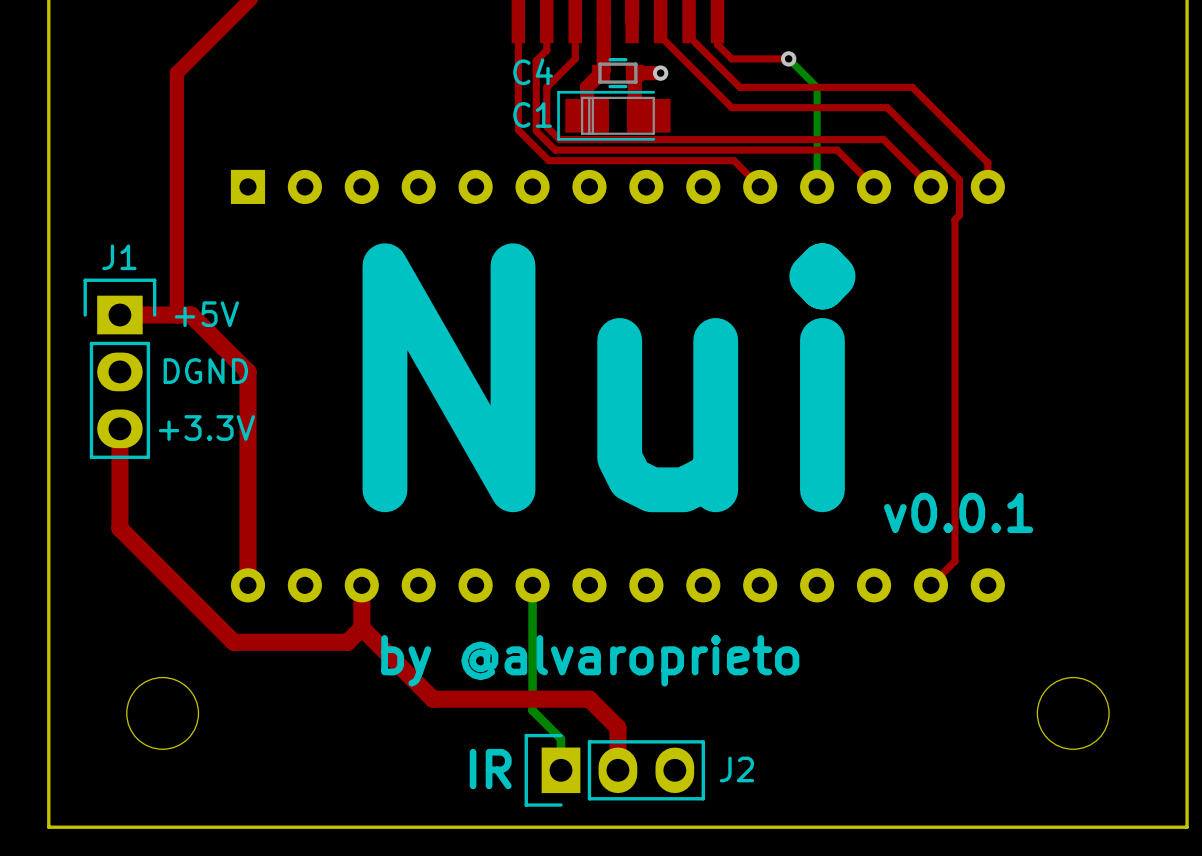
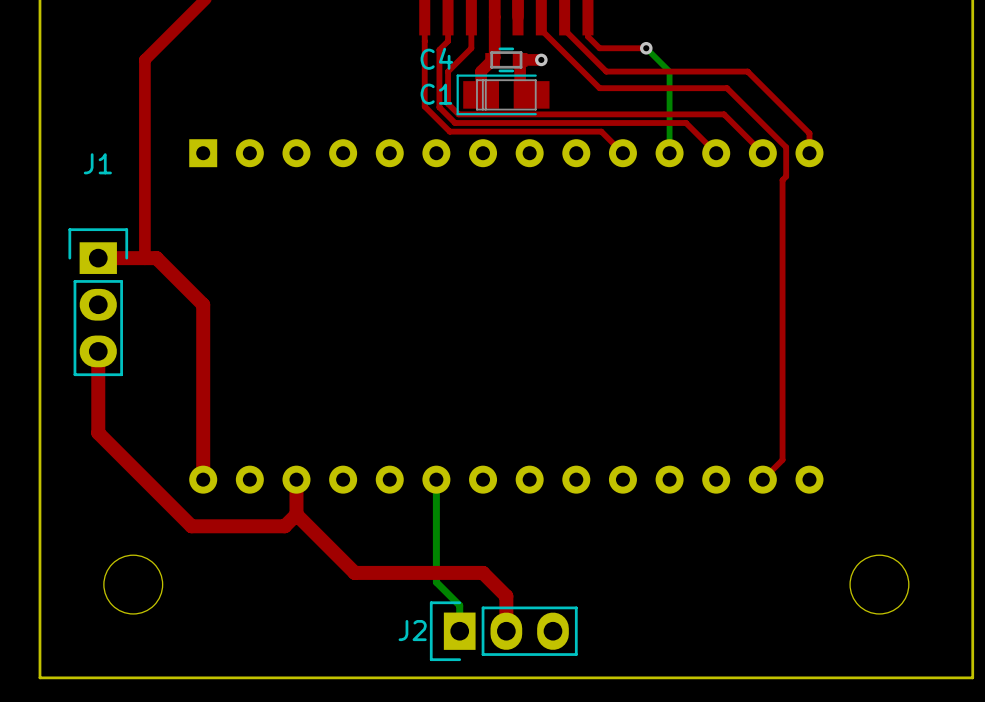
J1 name position: J1 (119, 257) -> J1 (97, 163)
text: +5V (206, 314) -> none
text: DGND (205, 371) -> none
text: Nui (609, 377) -> none
text: +3.3V (206, 427) -> none
text: v0.0.1 (958, 512) -> none
text: by @alvaroprieto (590, 660) -> none
text: IR (490, 769) -> none
J2 name position: J2 (736, 769) -> J2 (412, 630)

